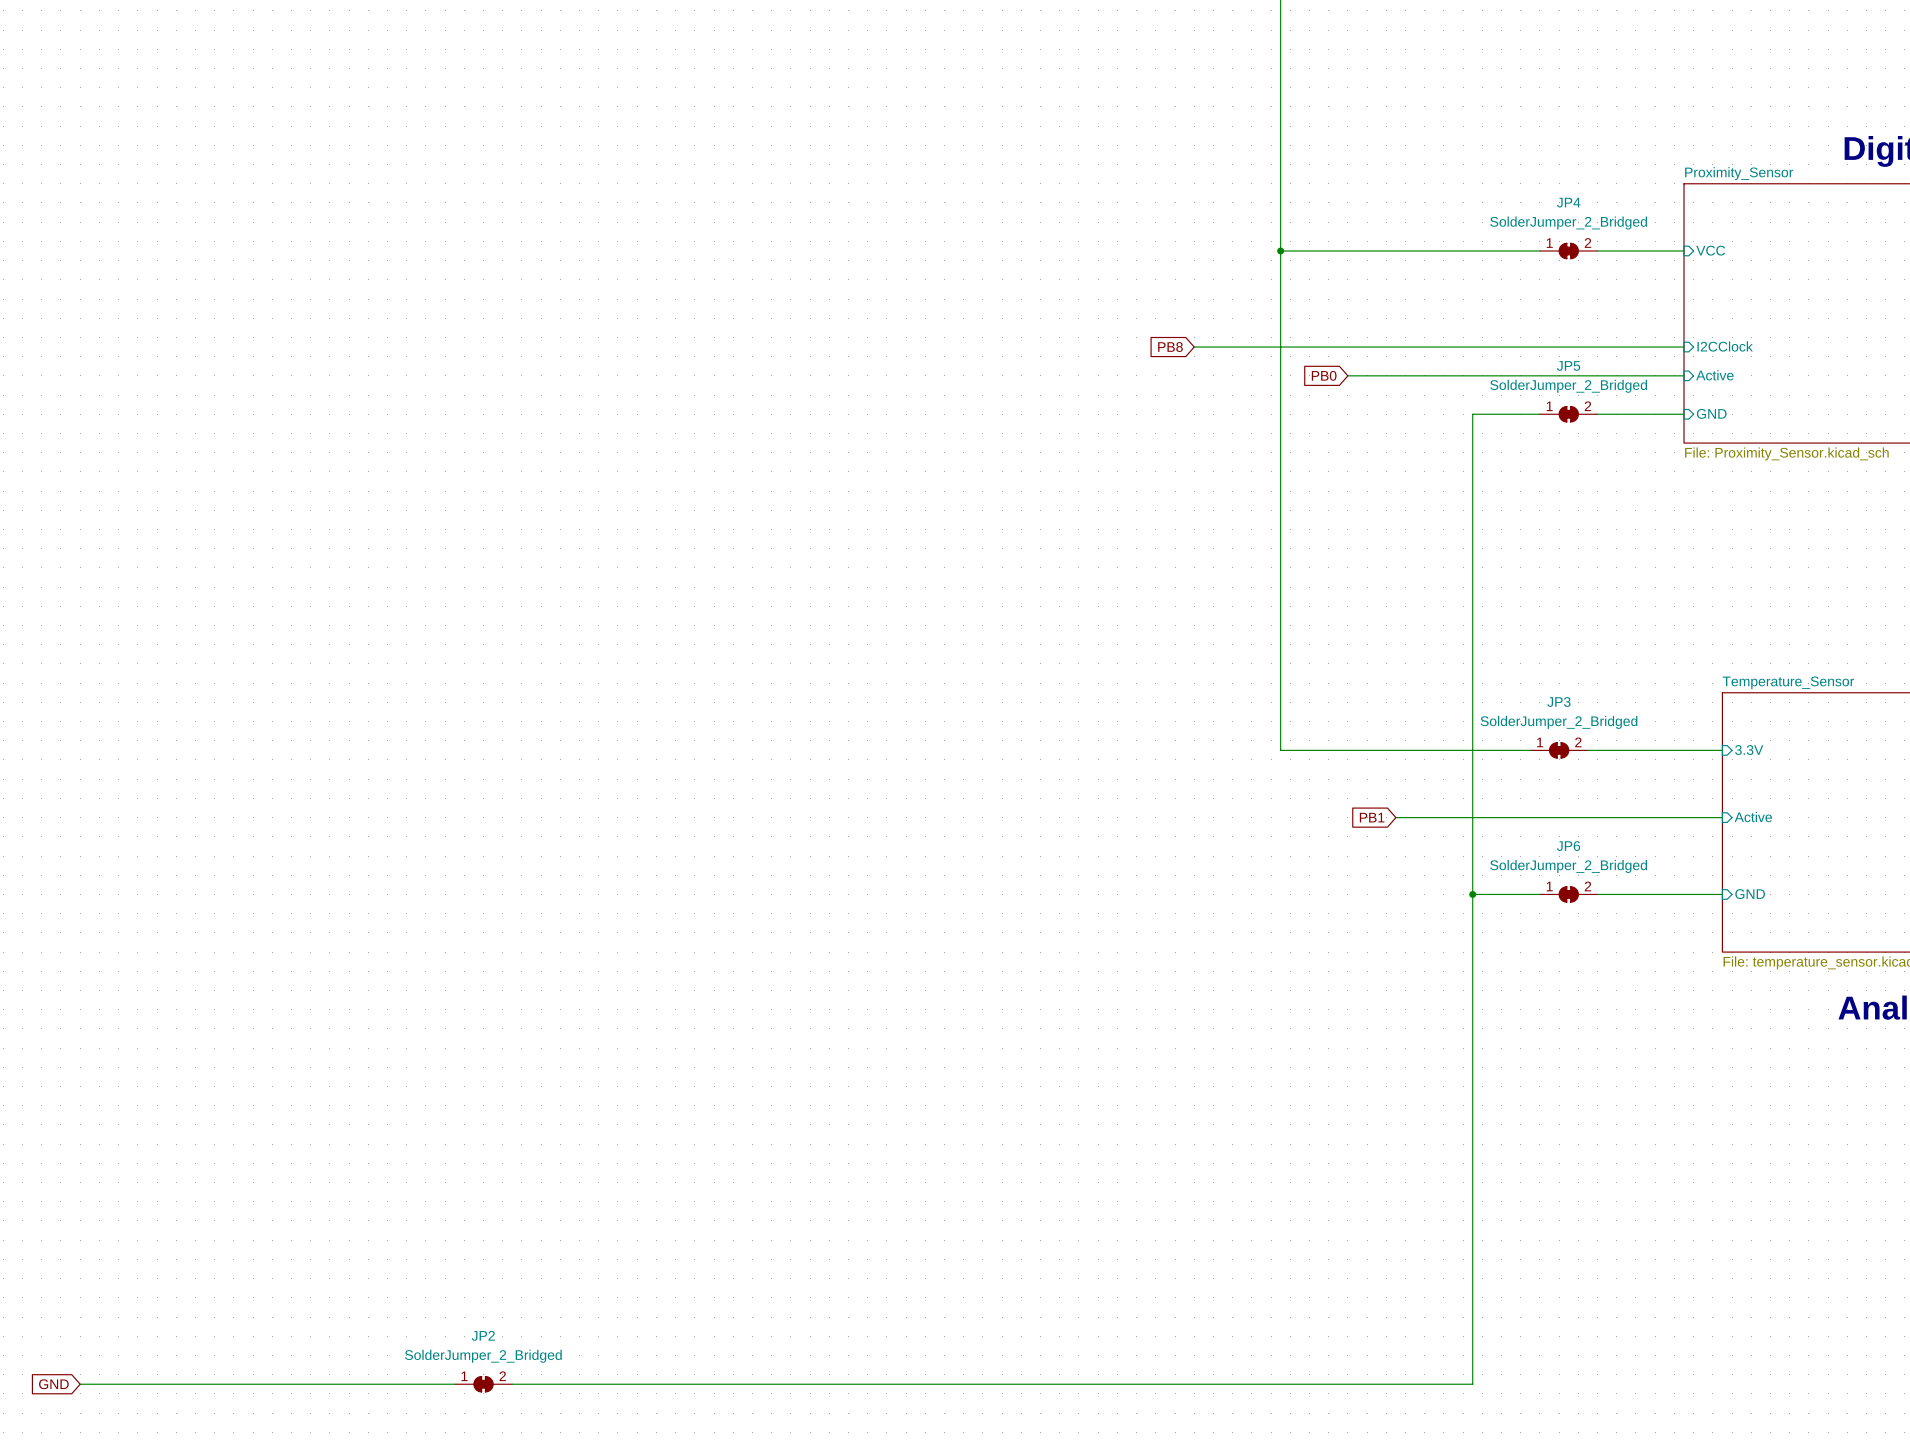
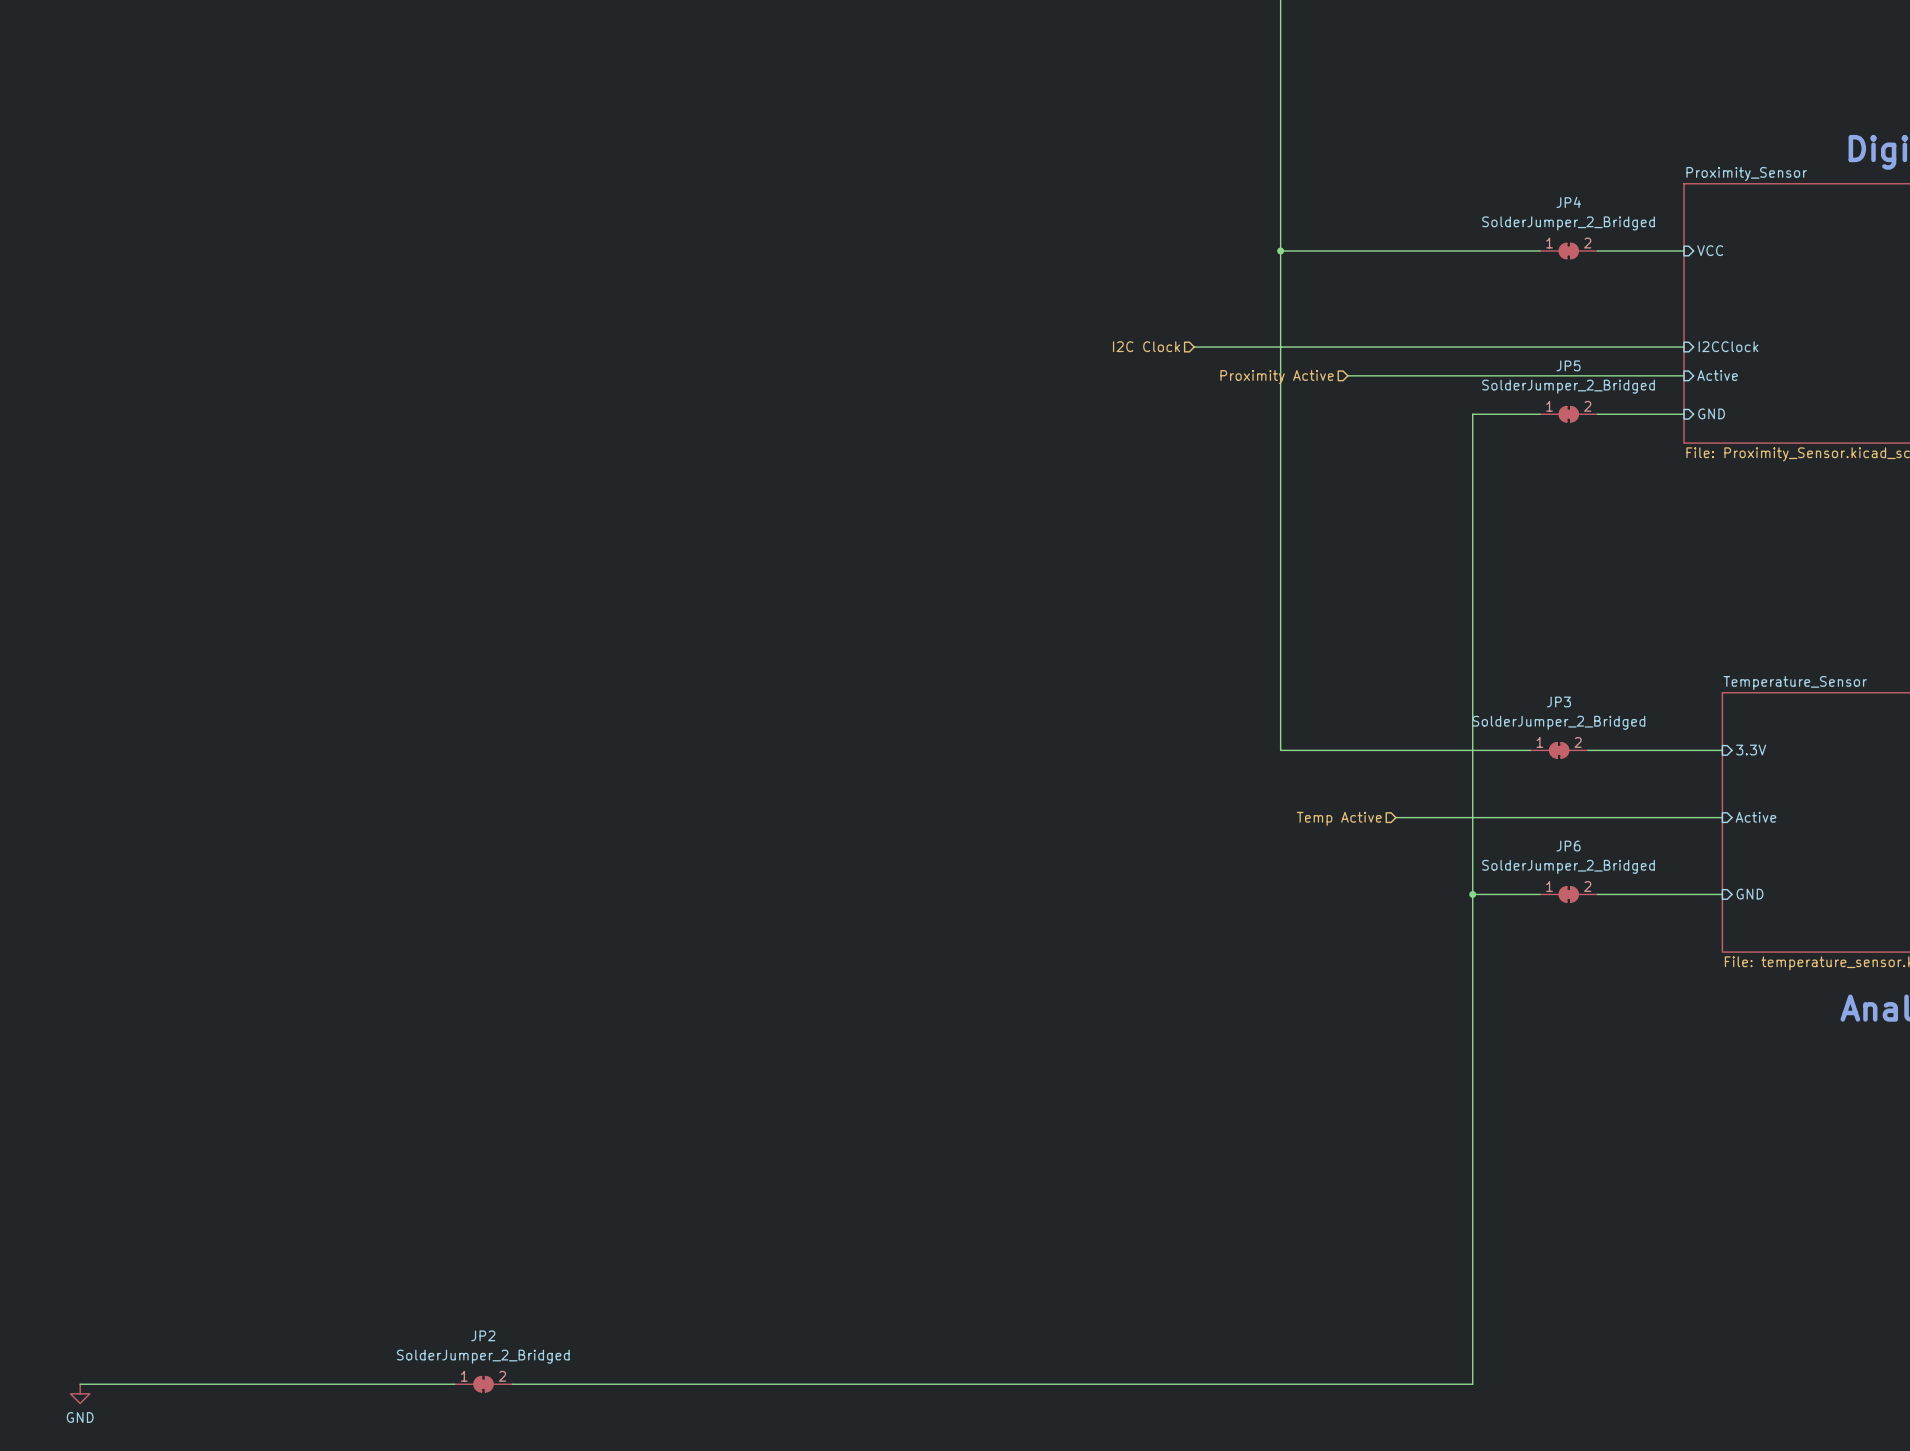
hierarchical label: none -> I2C Clock (1146, 346)
global label: PB8 (1170, 347) -> none
global label: PB0 (1324, 375) -> none
hierarchical label: none -> Proximity Active (1277, 377)
global label: PB1 (1372, 817) -> none
hierarchical label: none -> Temp Active (1339, 818)
global label: GND (53, 1384) -> none
power symbol: none -> GND (80, 1393)

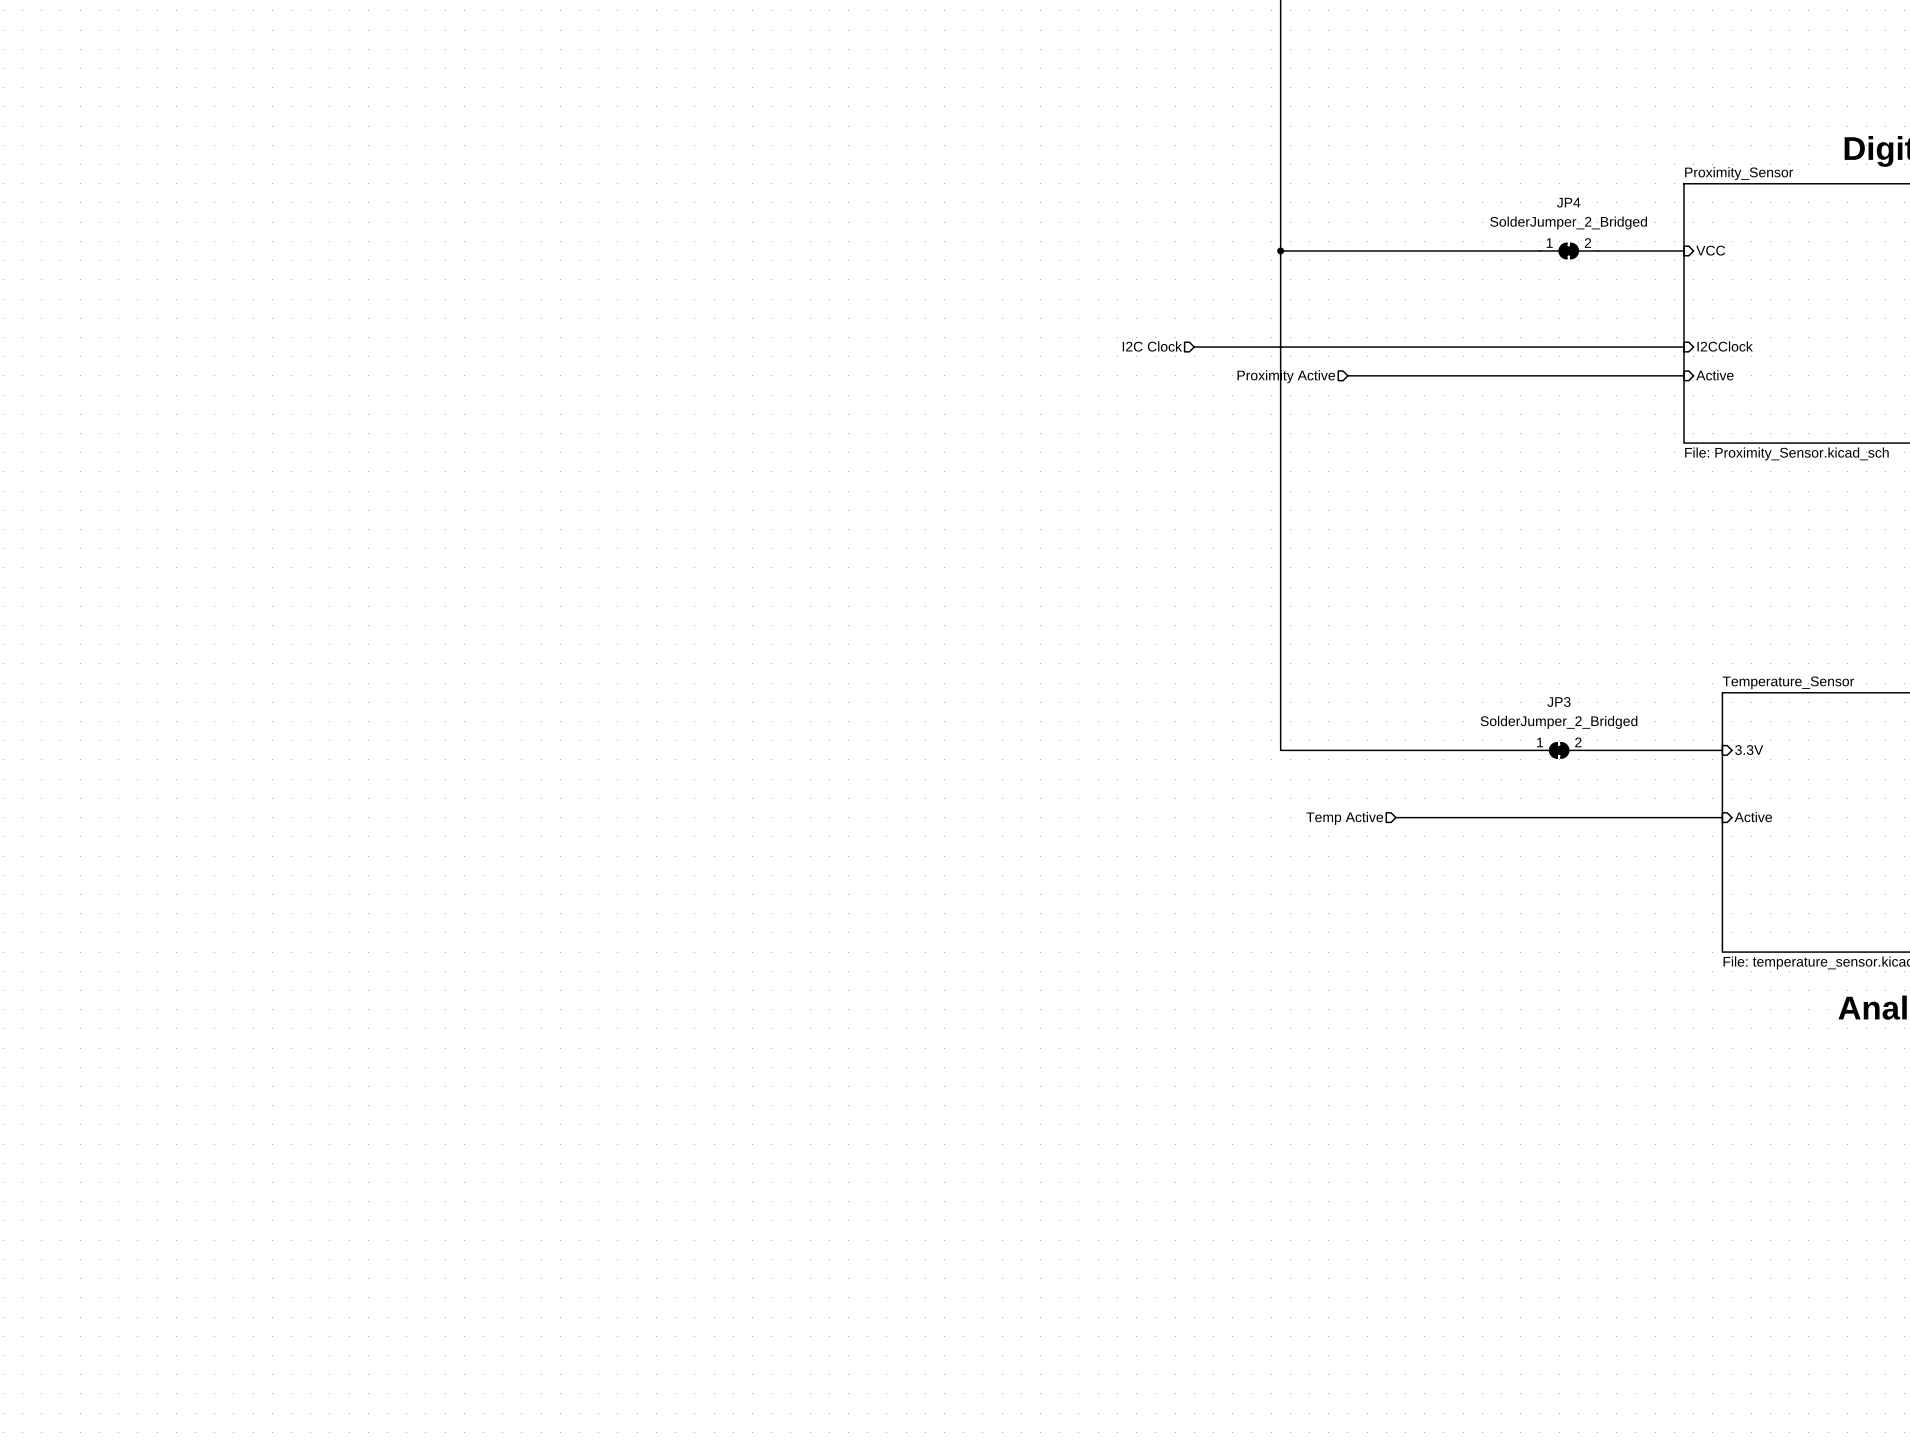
sheet pin: GND (1711, 413) -> none
wire: (1539, 414) (1472, 414) (1472, 1384) (512, 1384) -> none
JP5: SolderJumper_2_Bridged (1568, 414) -> none
wire: (1597, 414) (1683, 414) -> none
wire: (1472, 894) (1539, 894) -> none
junction: (1472, 894) -> none
JP6: SolderJumper_2_Bridged (1568, 894) -> none
wire: (1597, 894) (1722, 894) -> none
sheet pin: GND (1750, 894) -> none
wire: (80, 1384) (454, 1384) -> none
JP2: SolderJumper_2_Bridged (483, 1384) -> none
power symbol: GND (80, 1393) -> none

